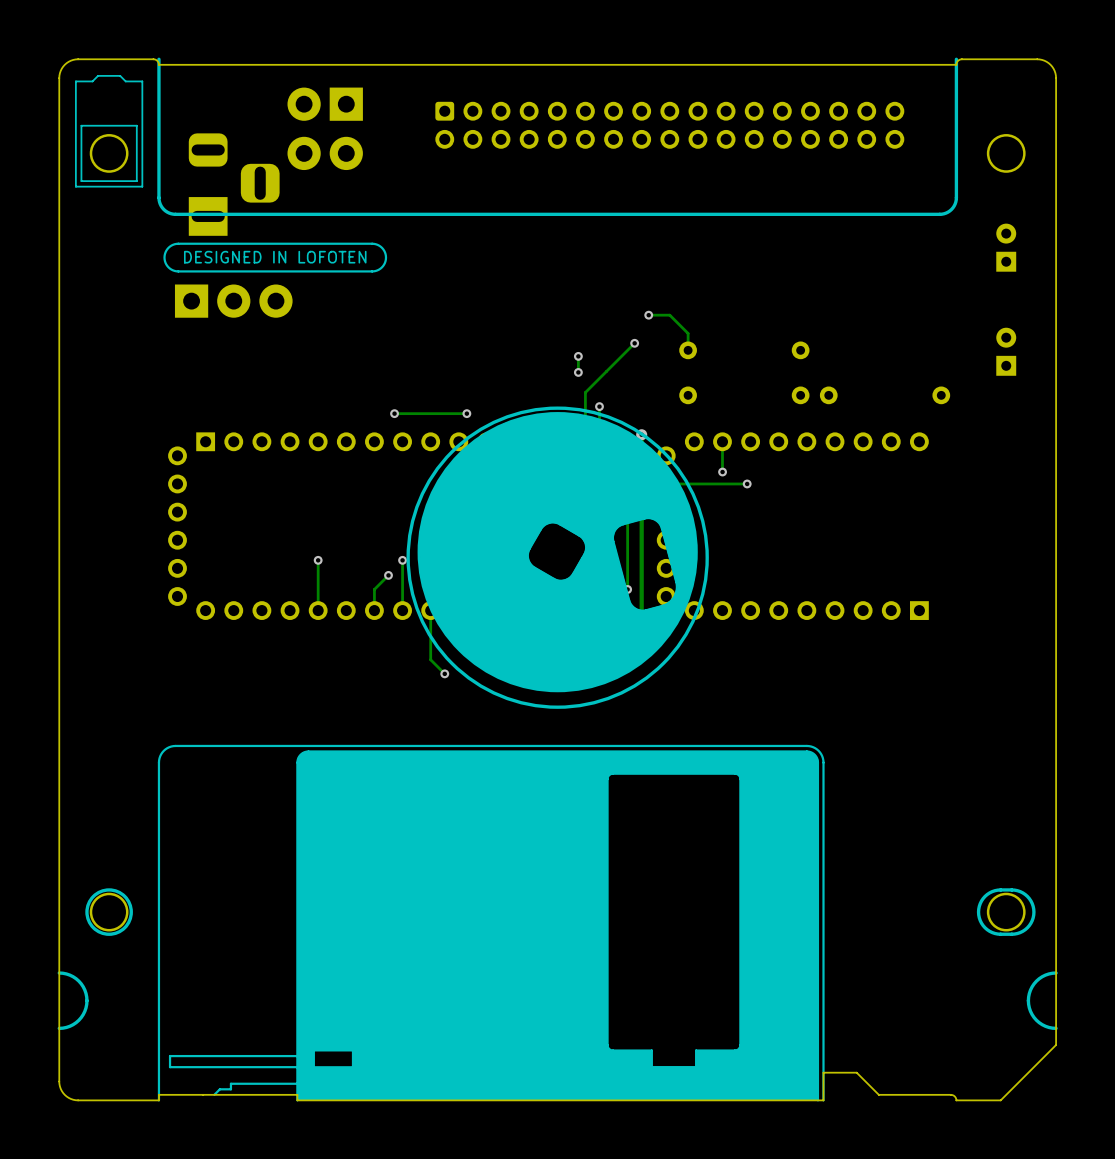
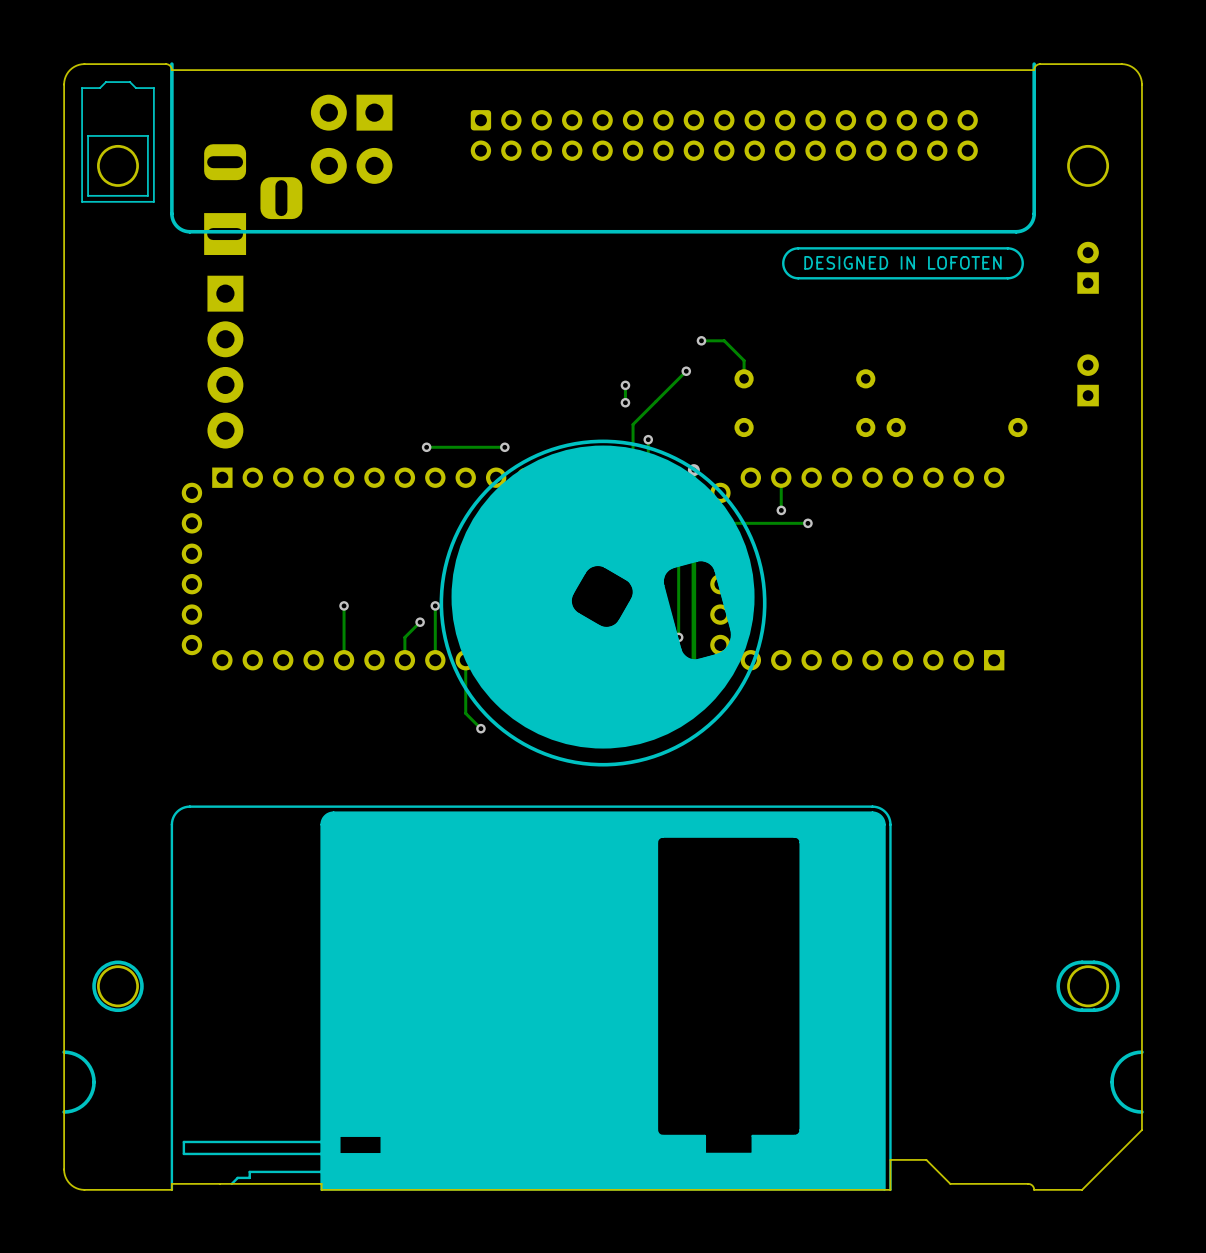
line: none -> (1007, 248) (796, 248) (786, 254) (783, 265) (787, 273) (798, 278) (1009, 278) (1019, 272) (1022, 261) (1016, 251) (1007, 248)
line: (372, 243) (176, 243) (167, 249) (164, 259) (168, 267) (178, 271) (373, 271) (383, 266) (385, 255) (381, 247) (372, 243) -> none
text: none -> DESIGNED IN LOFOTEN (903, 262)
text: DESIGNED IN LOFOTEN (275, 257) -> none
part: (233, 301) -> none
part: none -> (225, 362)

